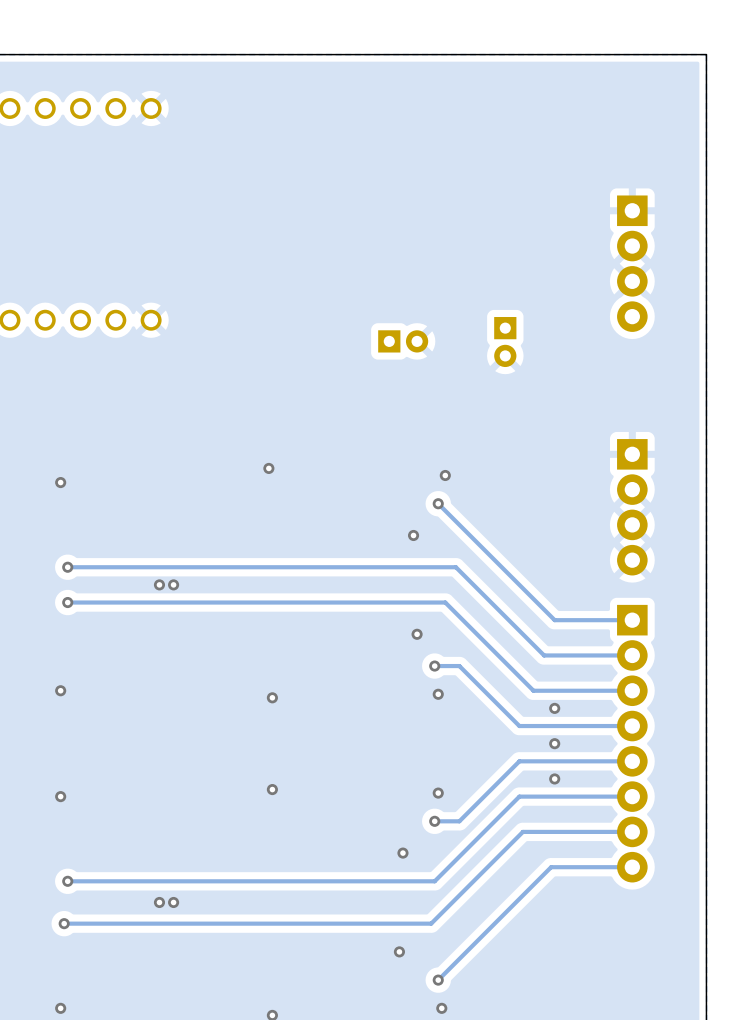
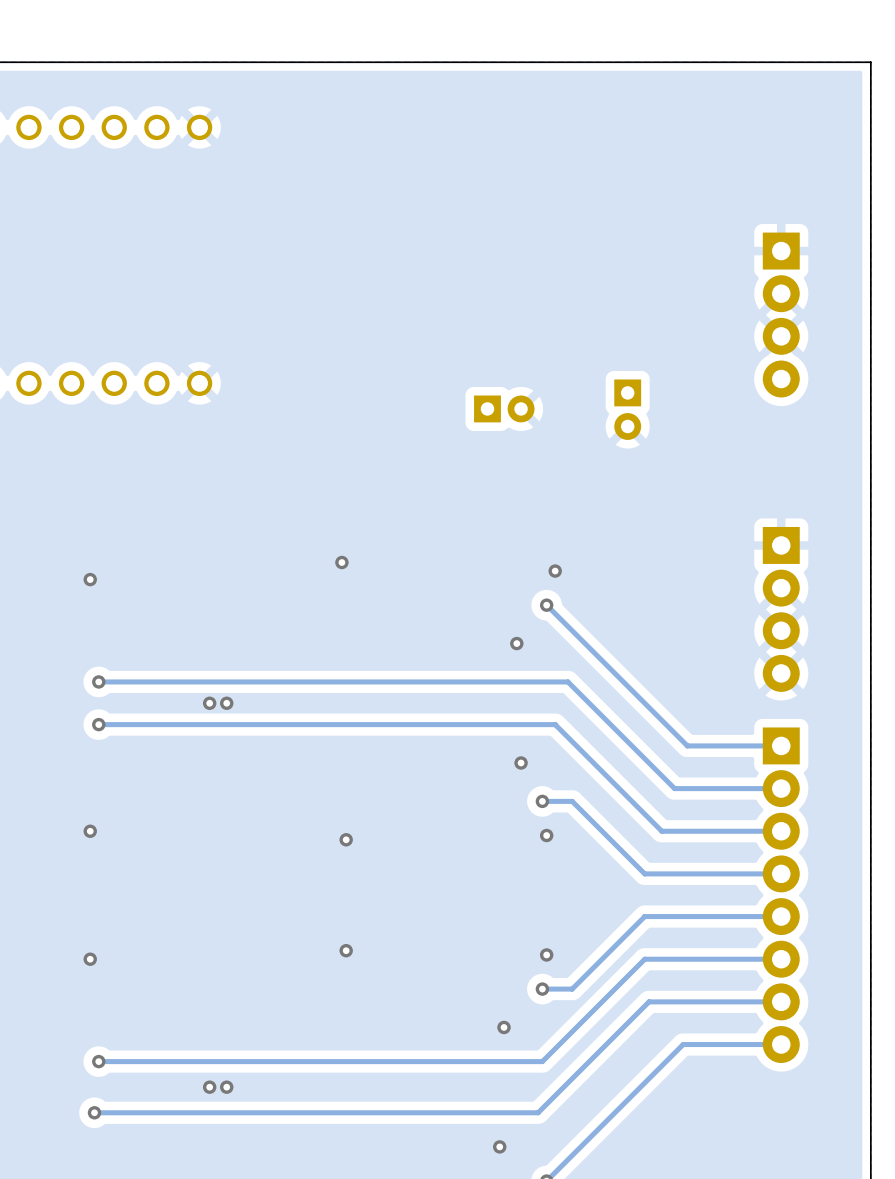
via: (554, 708) -> none
via: (554, 743) -> none
via: (554, 778) -> none

